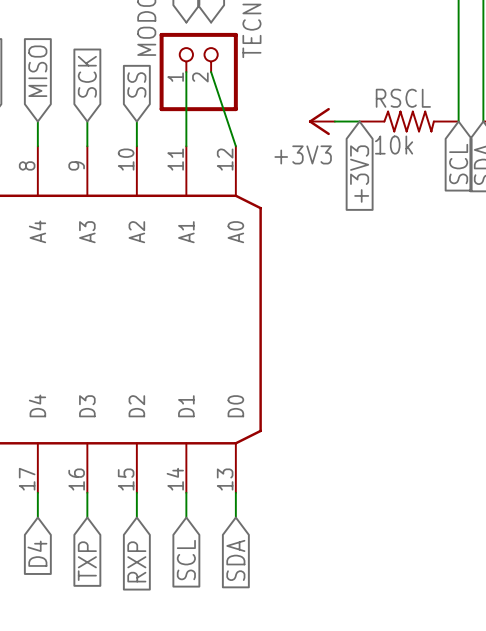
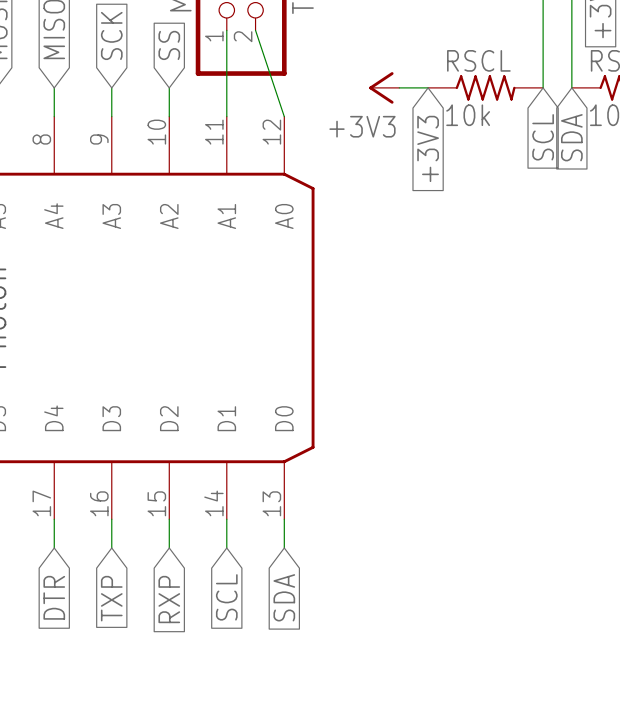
global label: D4 (37, 553) -> DTR (54, 597)

